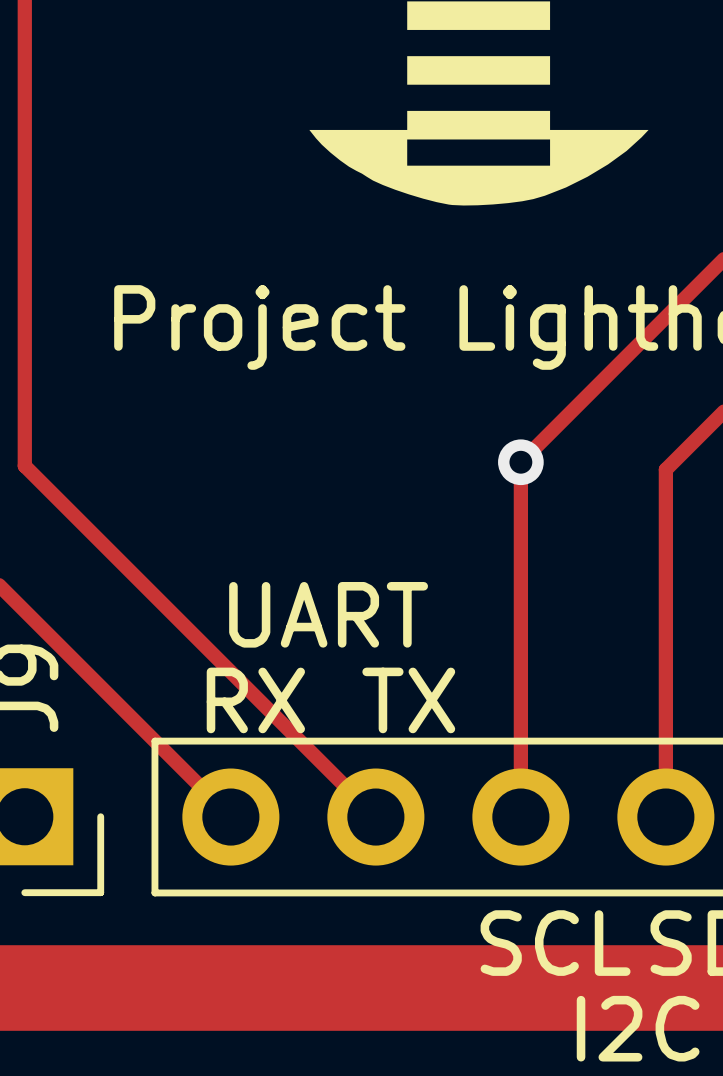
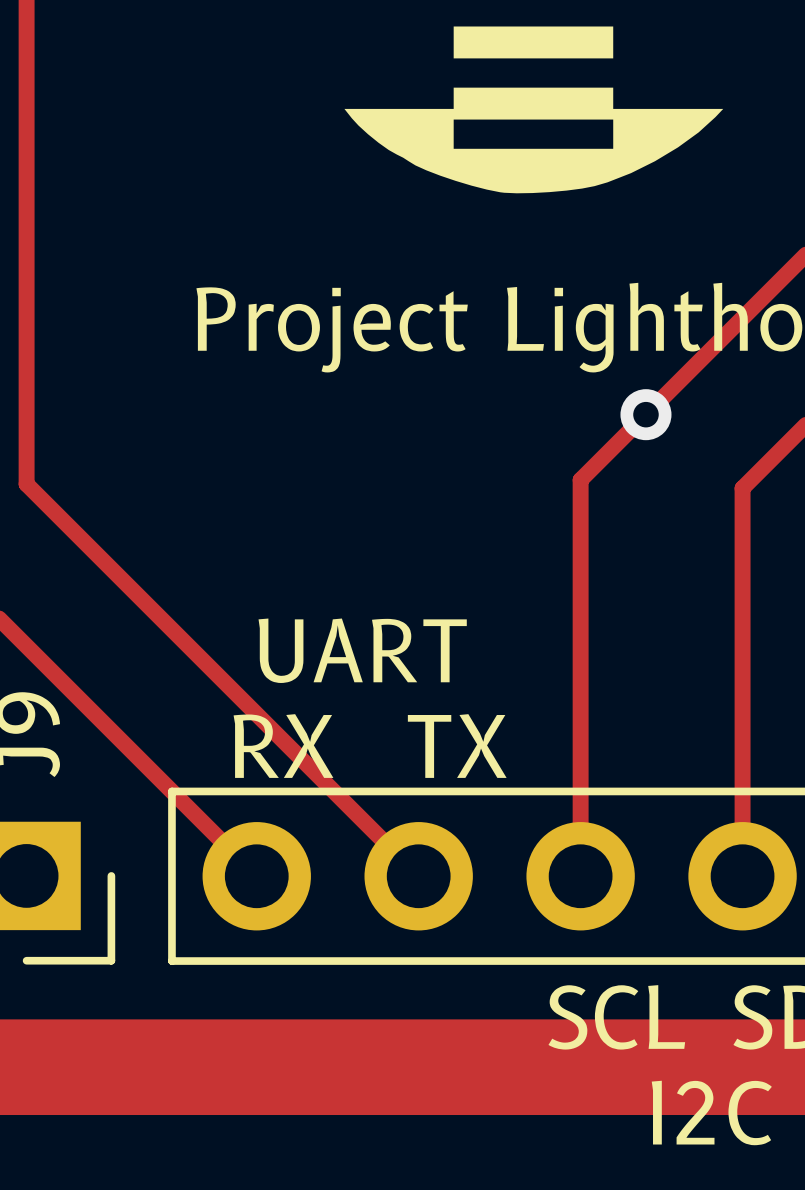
via position: (520, 462) -> (645, 414)

